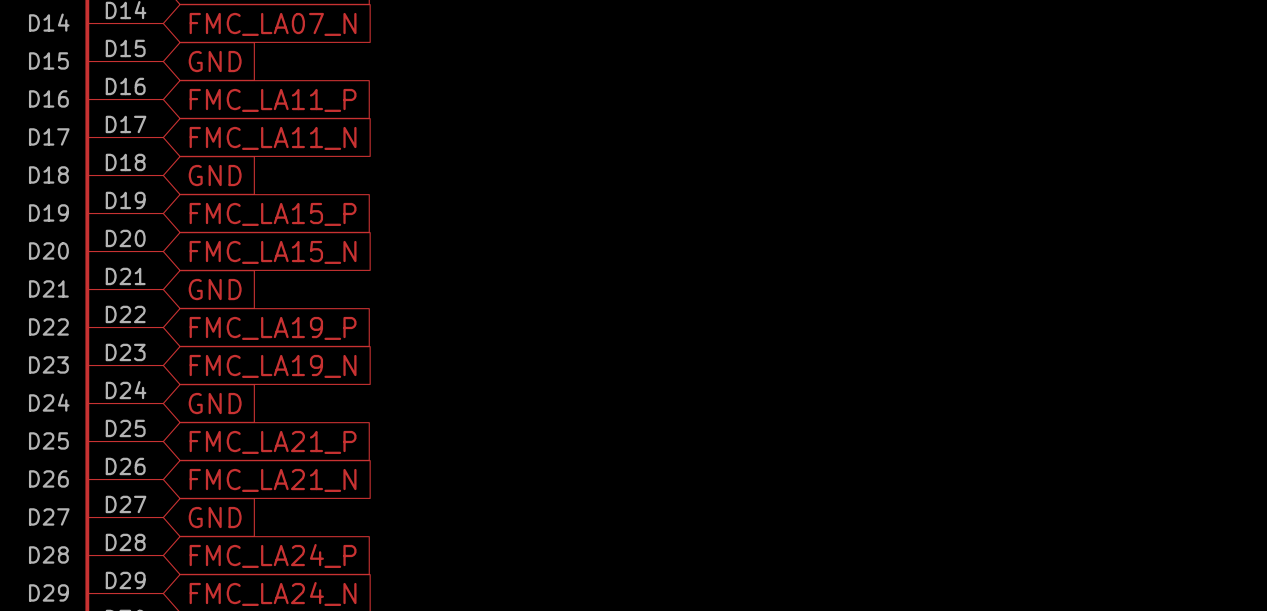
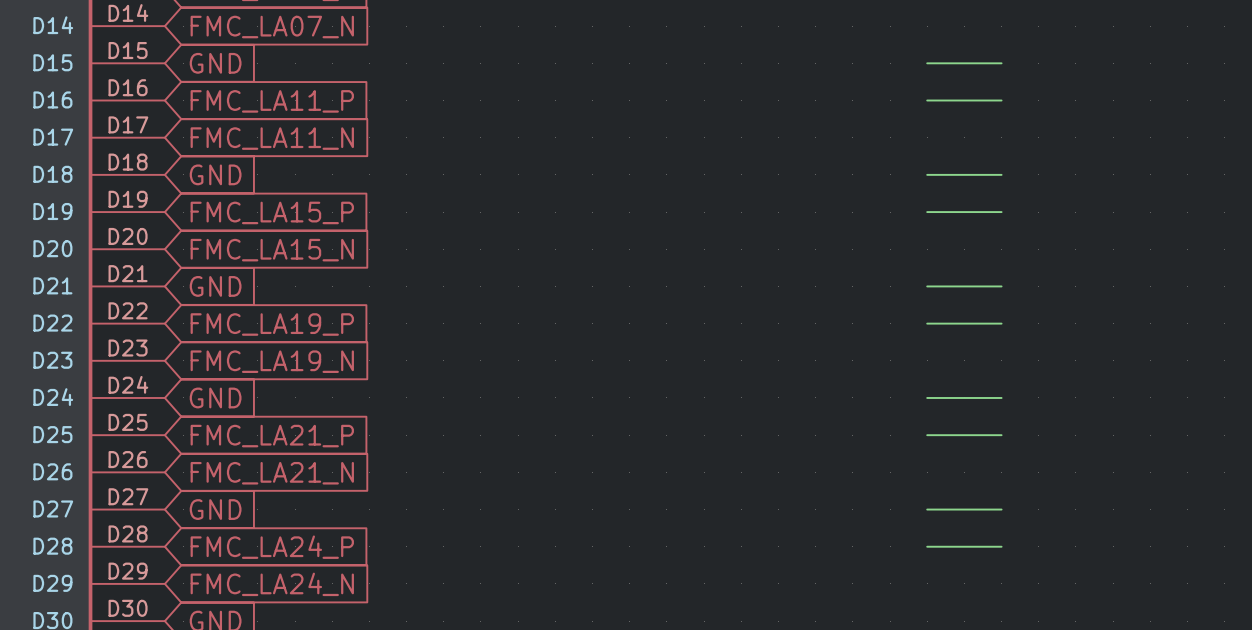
wire: none -> (927, 63) (1001, 63)
wire: none -> (927, 100) (1001, 100)
wire: none -> (927, 174) (1001, 174)
wire: none -> (927, 212) (1001, 212)
wire: none -> (927, 286) (1001, 286)
wire: none -> (927, 323) (1001, 323)
wire: none -> (927, 397) (1001, 397)
wire: none -> (927, 435) (1001, 435)
wire: none -> (927, 509) (1001, 509)
wire: none -> (927, 546) (1001, 546)

